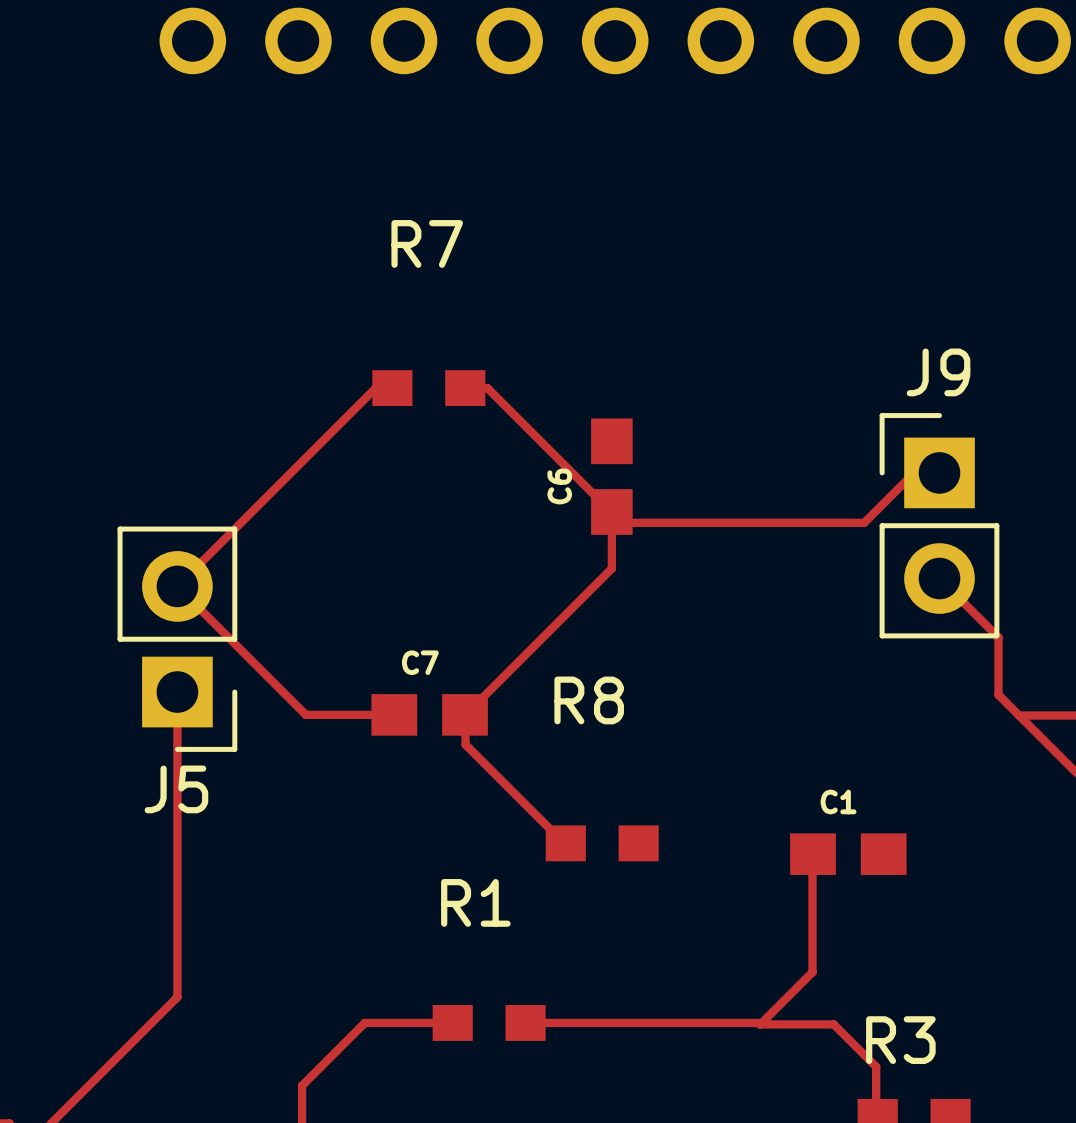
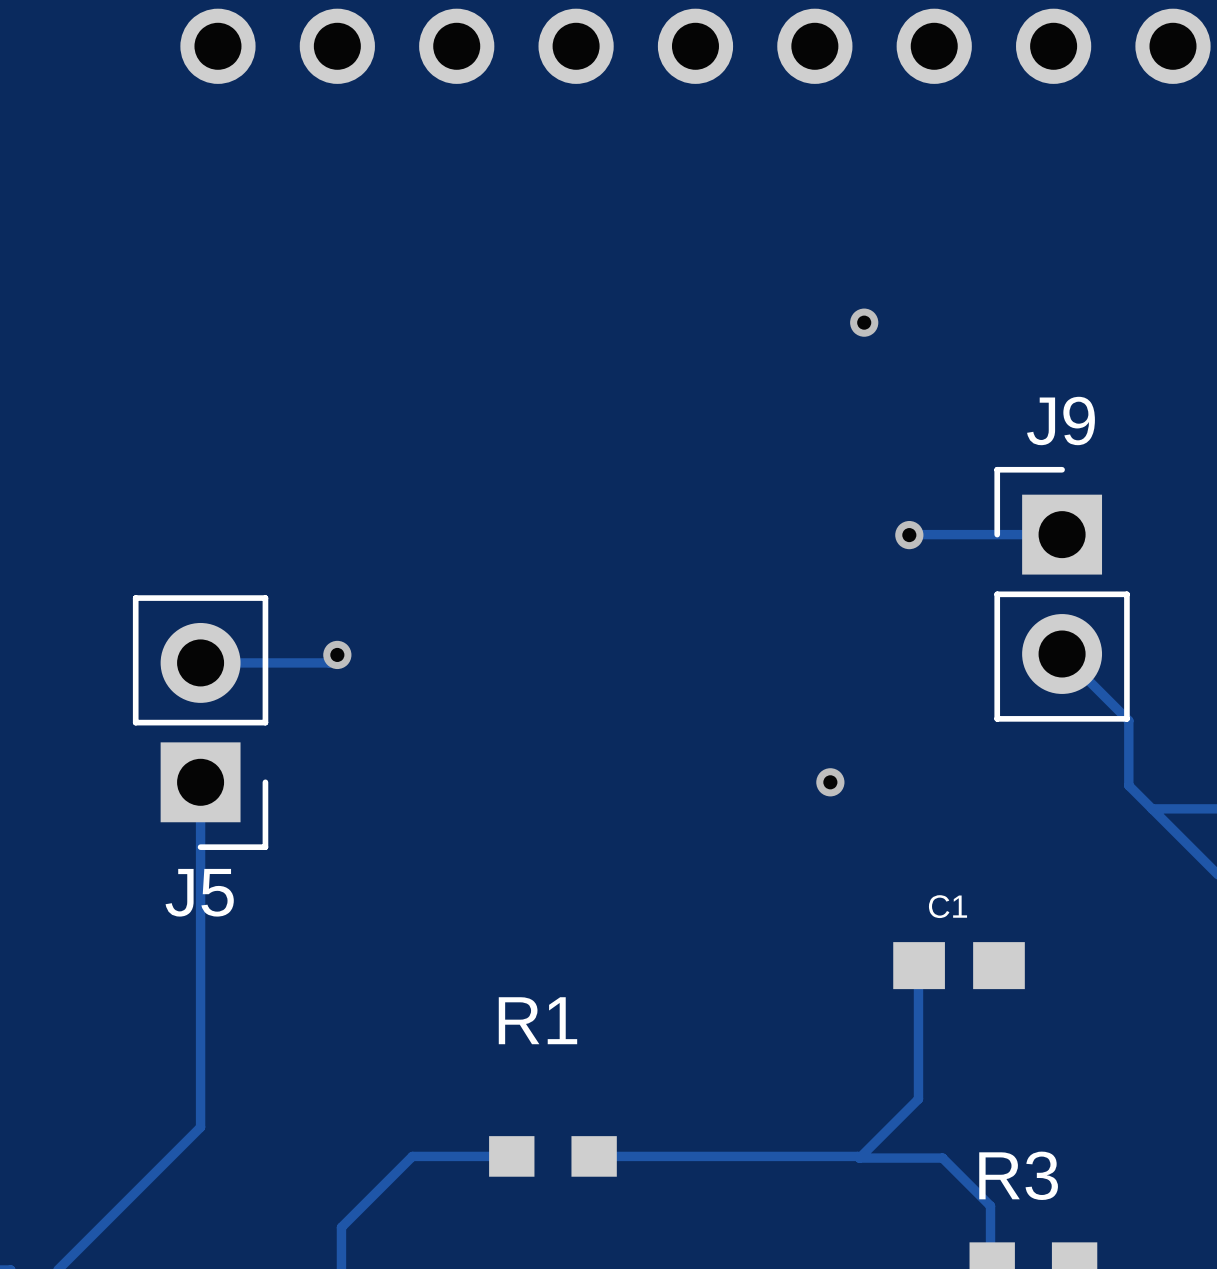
via: none -> (864, 322)
track: (390, 388) (375, 388) (177, 586) (305, 714) (393, 714) -> none
R7: (428, 388) -> none
track: (466, 388) (487, 388) (622, 522) (864, 522) (914, 472) -> (909, 534) (1033, 534)
via: none -> (909, 535)
C6: (611, 476) -> none
track: (611, 512) (611, 568) (465, 714) (465, 744) (564, 843) -> none
track: none -> (337, 654) (329, 662) (200, 662)
via: none -> (337, 654)
via: none -> (830, 782)
C7: (429, 714) -> none
R8: (602, 843) -> none

